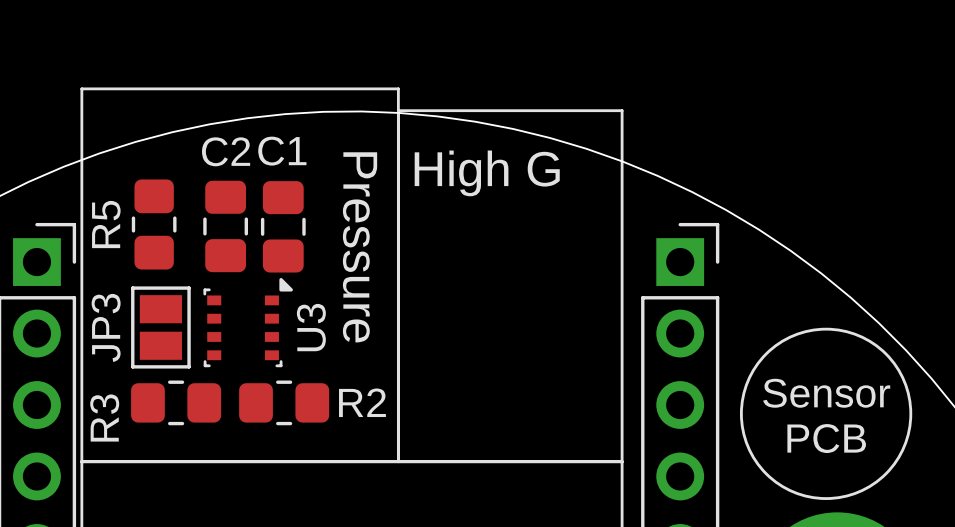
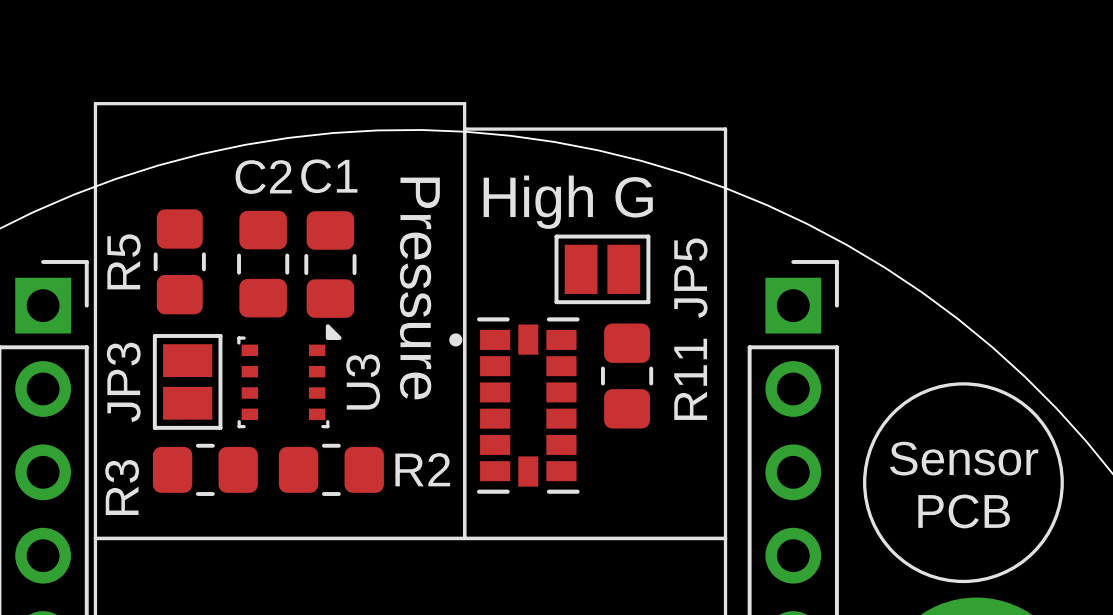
JP5: none -> (602, 269)
R11: none -> (627, 376)
part: none -> (514, 405)

